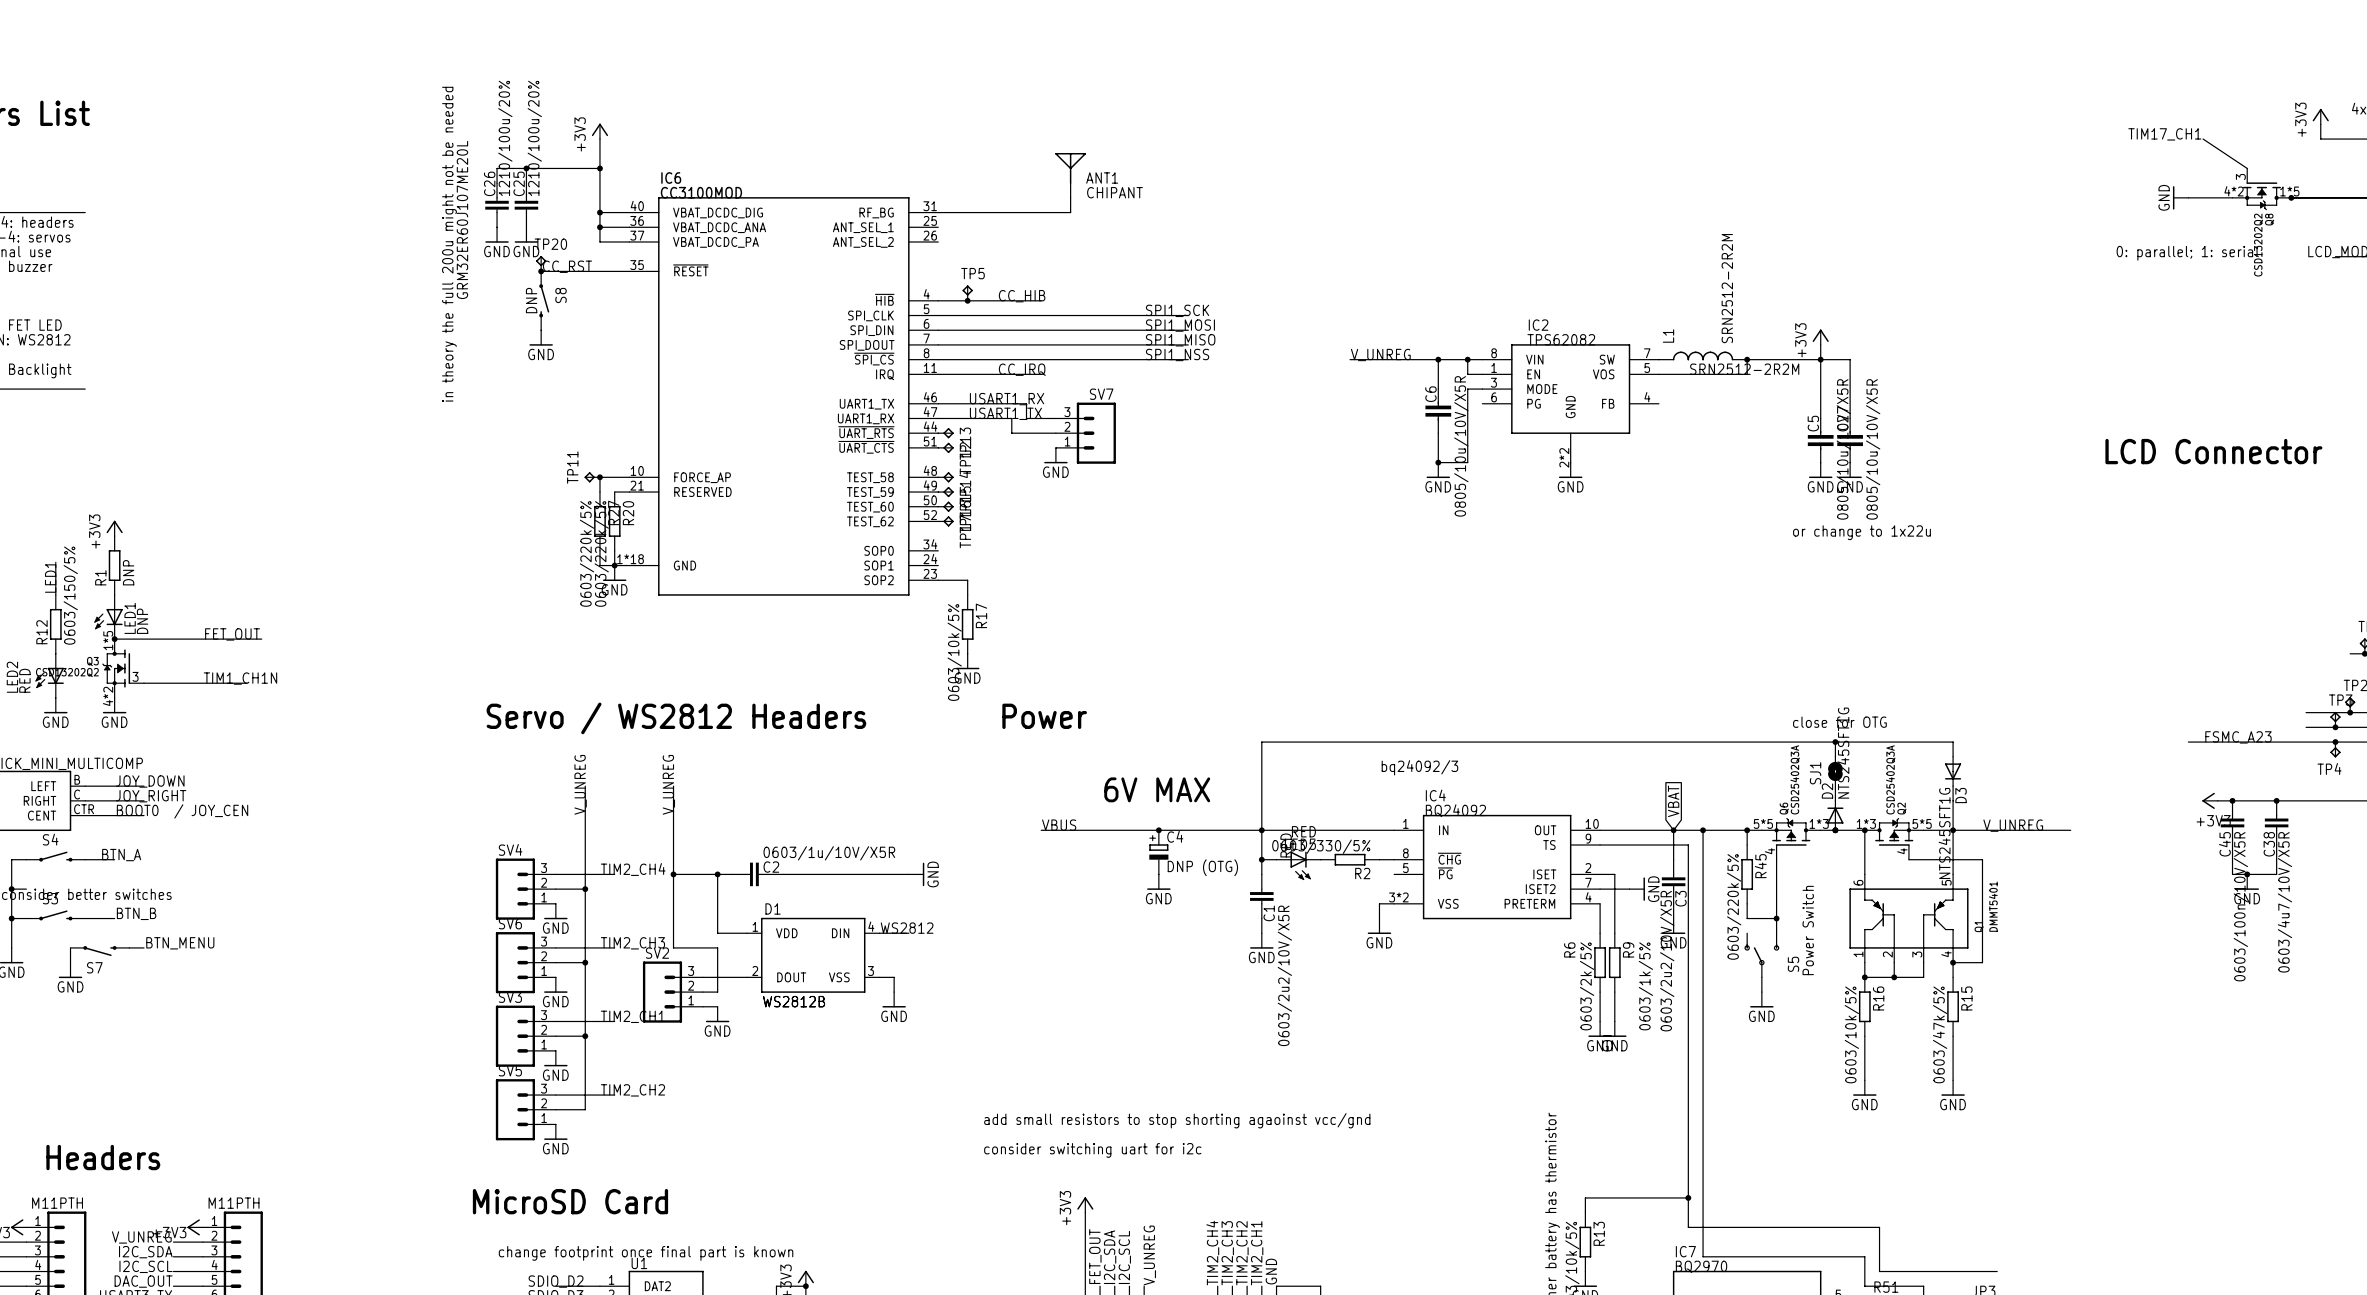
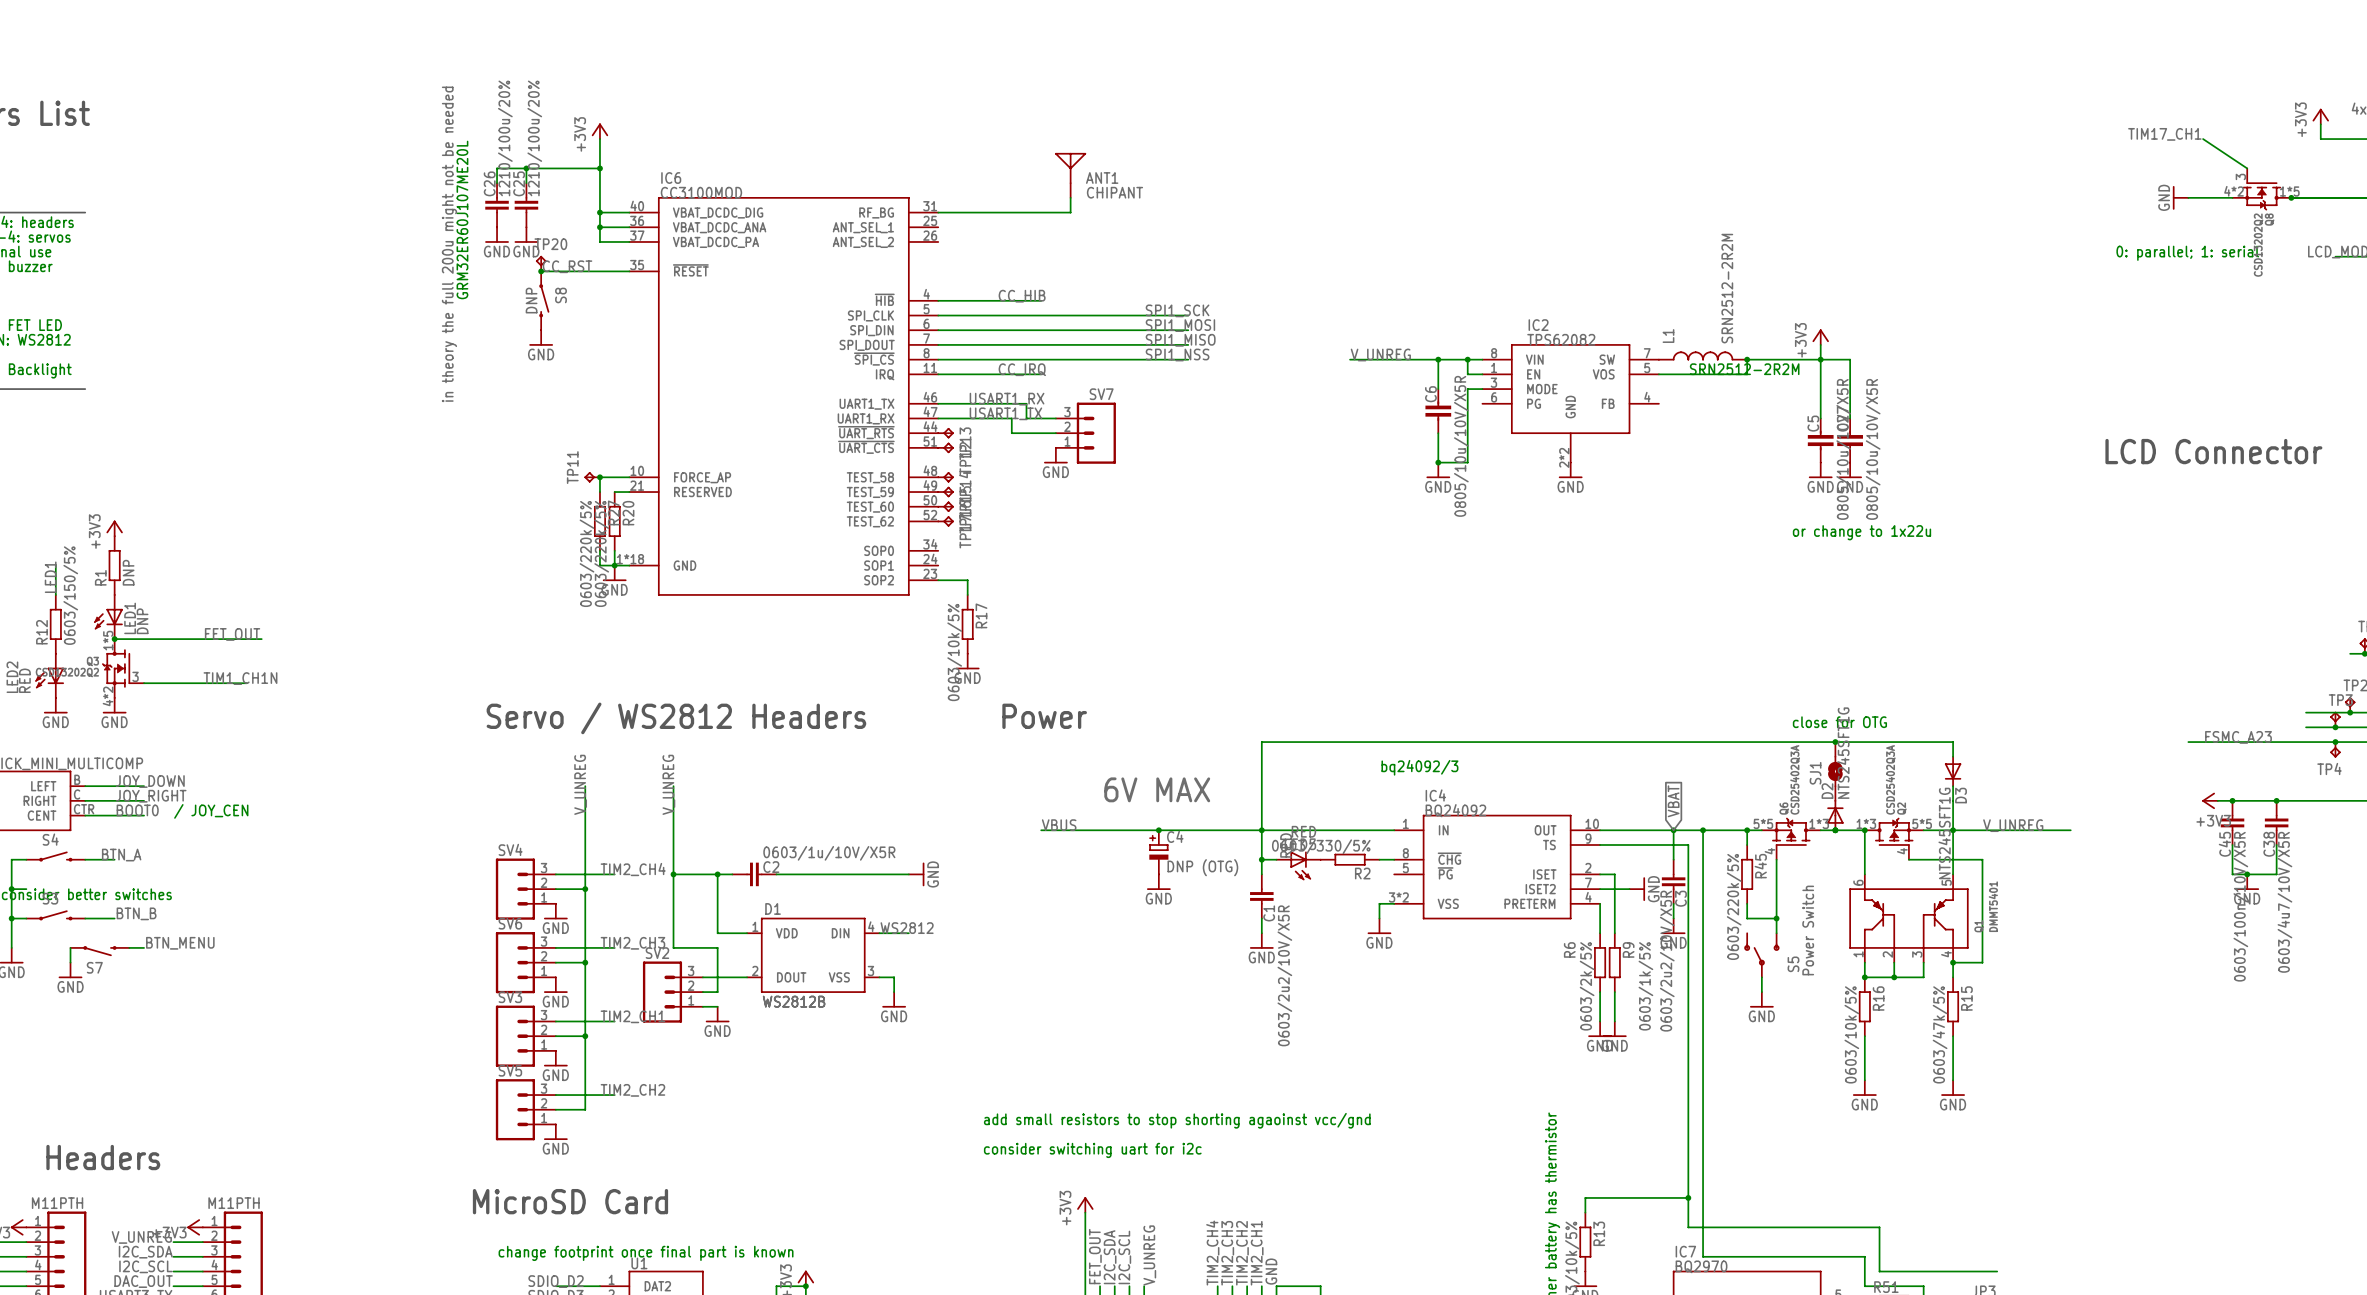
TP5: (967, 293) -> none
junction: (967, 300) -> none

